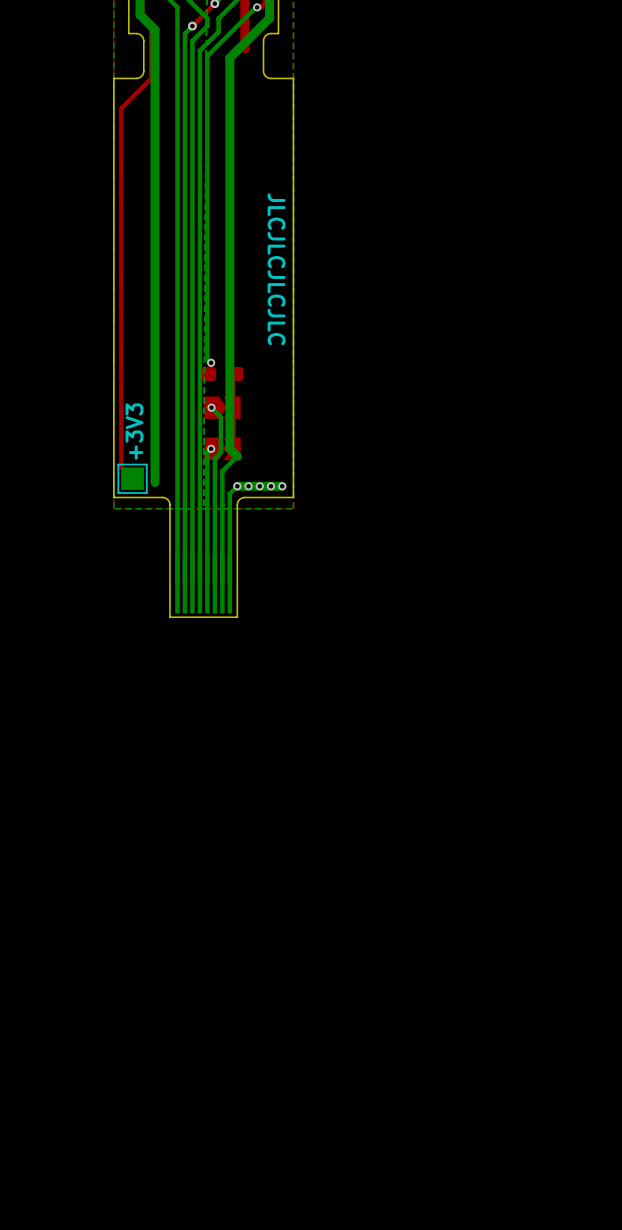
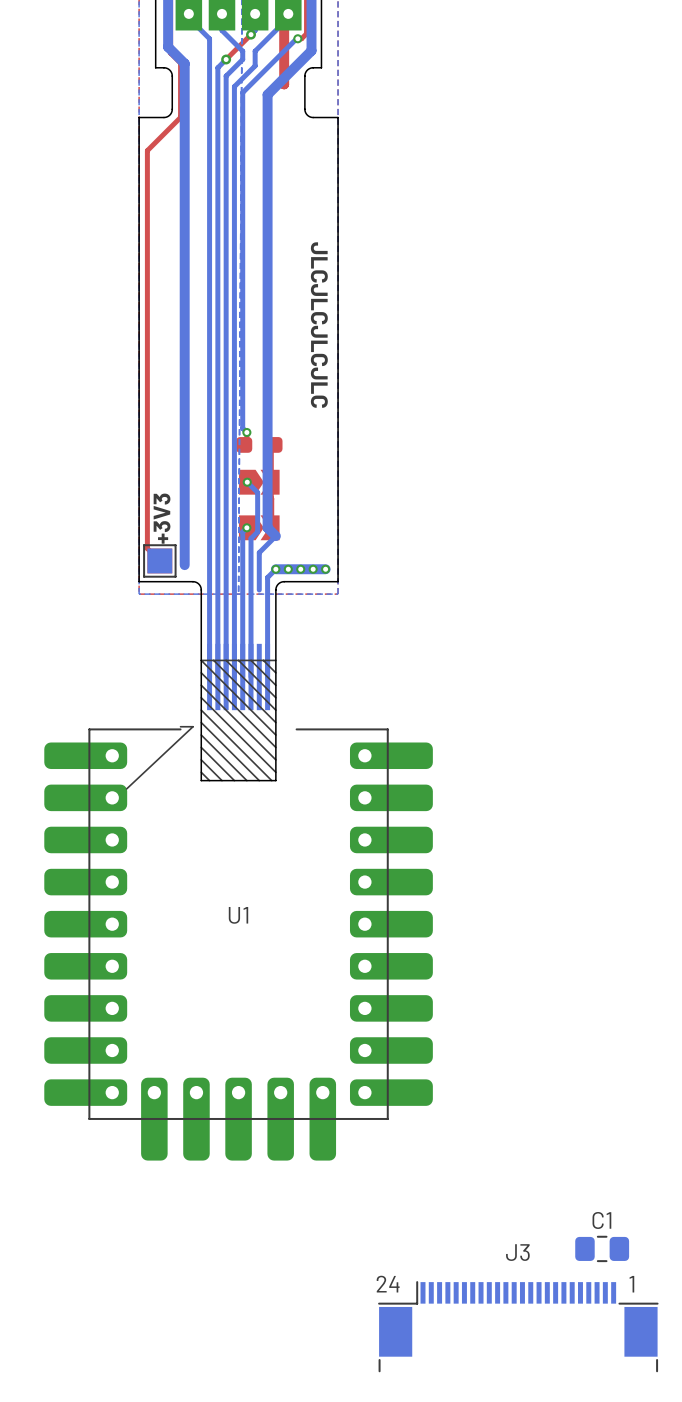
bottom track: (222, 504) (222, 583) -> none
line: none -> (213, 660) (275, 722)
line: none -> (226, 660) (275, 710)
line: none -> (238, 660) (275, 697)
line: none -> (251, 660) (275, 685)
line: none -> (263, 660) (275, 672)
line: none -> (275, 660) (201, 660) (275, 735)
line: none -> (201, 672) (275, 747)
line: none -> (201, 685) (275, 759)
line: none -> (201, 697) (275, 772)
line: none -> (201, 710) (271, 780)
board edge: (237, 617) (169, 617) -> (275, 714) (275, 780) (201, 780) (201, 714)
line: none -> (201, 722) (259, 780)
line: none -> (180, 726) (192, 726) (126, 788)
line: none -> (201, 735) (246, 780)
line: none -> (201, 747) (234, 780)
line: none -> (201, 759) (222, 780)
line: none -> (201, 772) (209, 780)
U1: none -> (238, 944)
C1: none -> (602, 1248)
text: none -> 24 (388, 1284)
text: none -> 1 (631, 1284)
J3: none -> (518, 1326)

